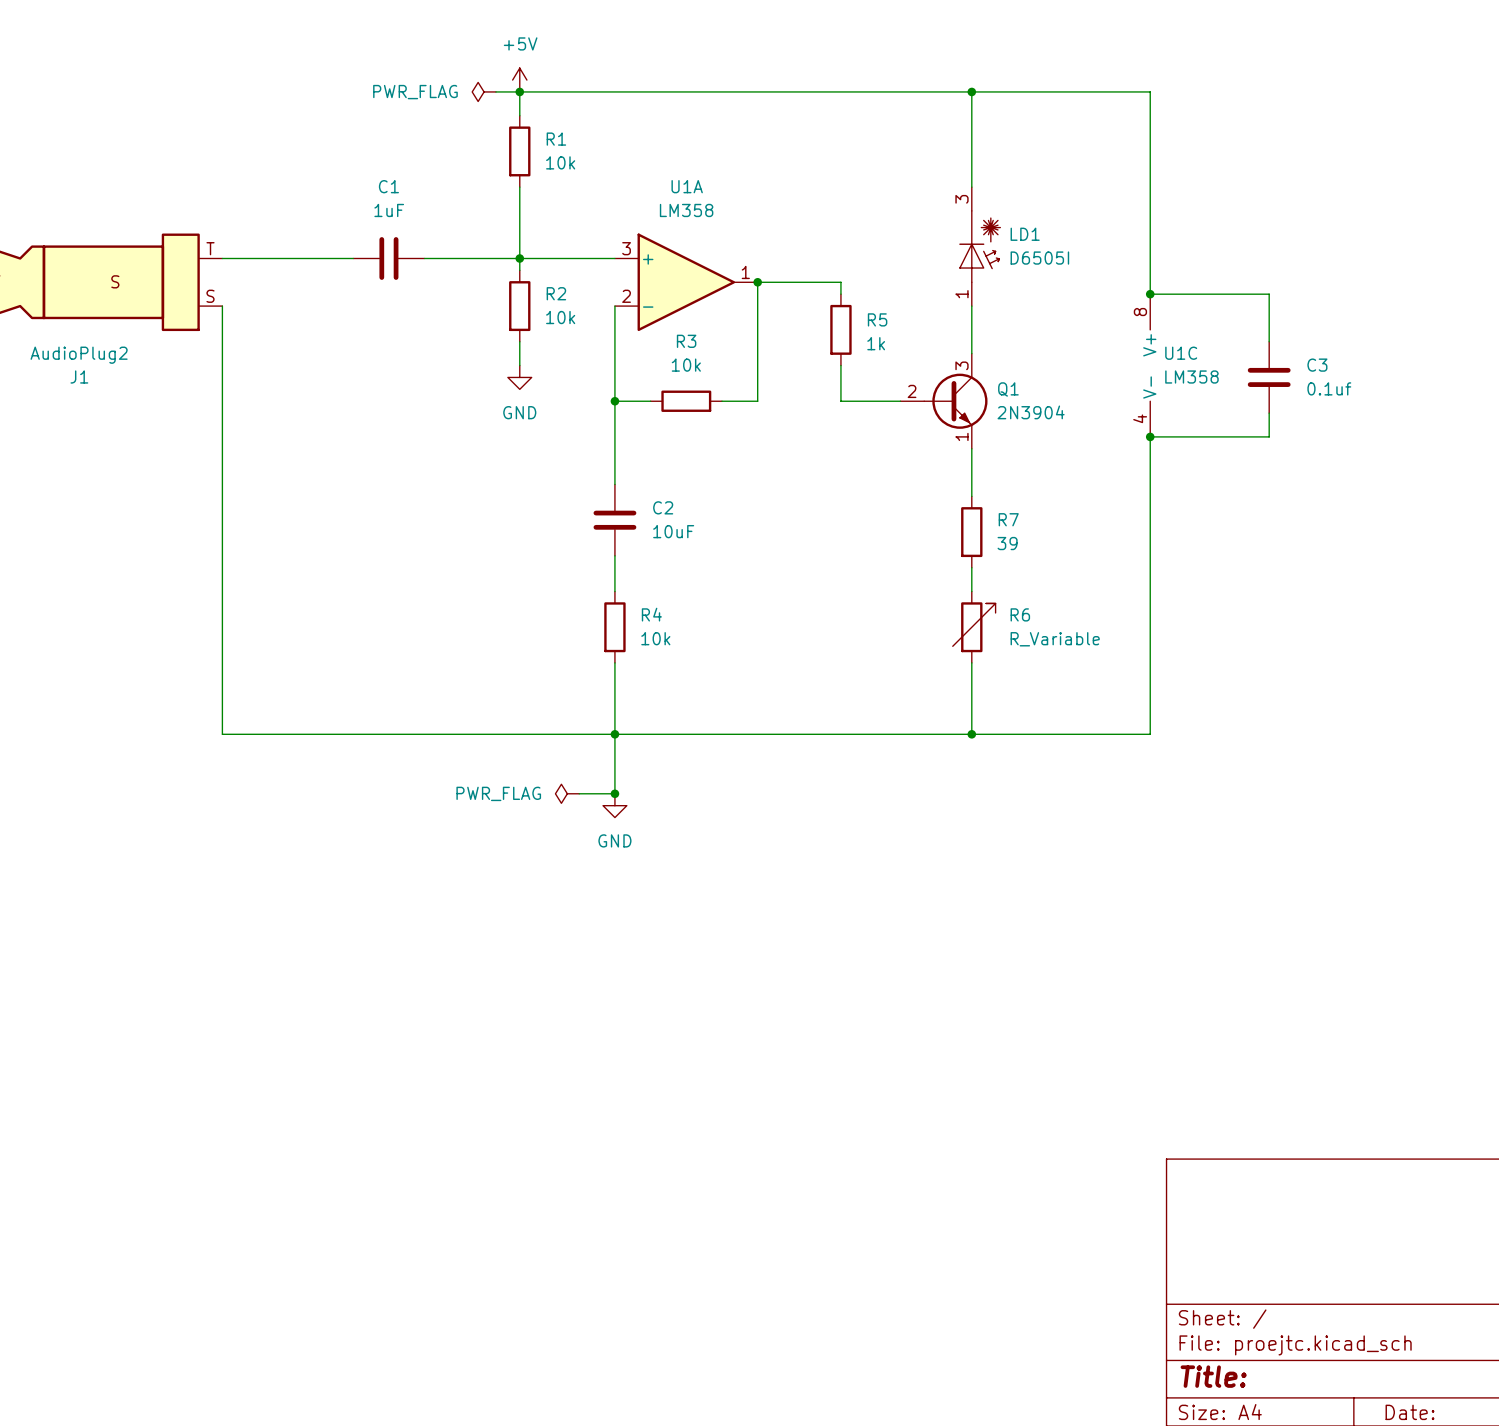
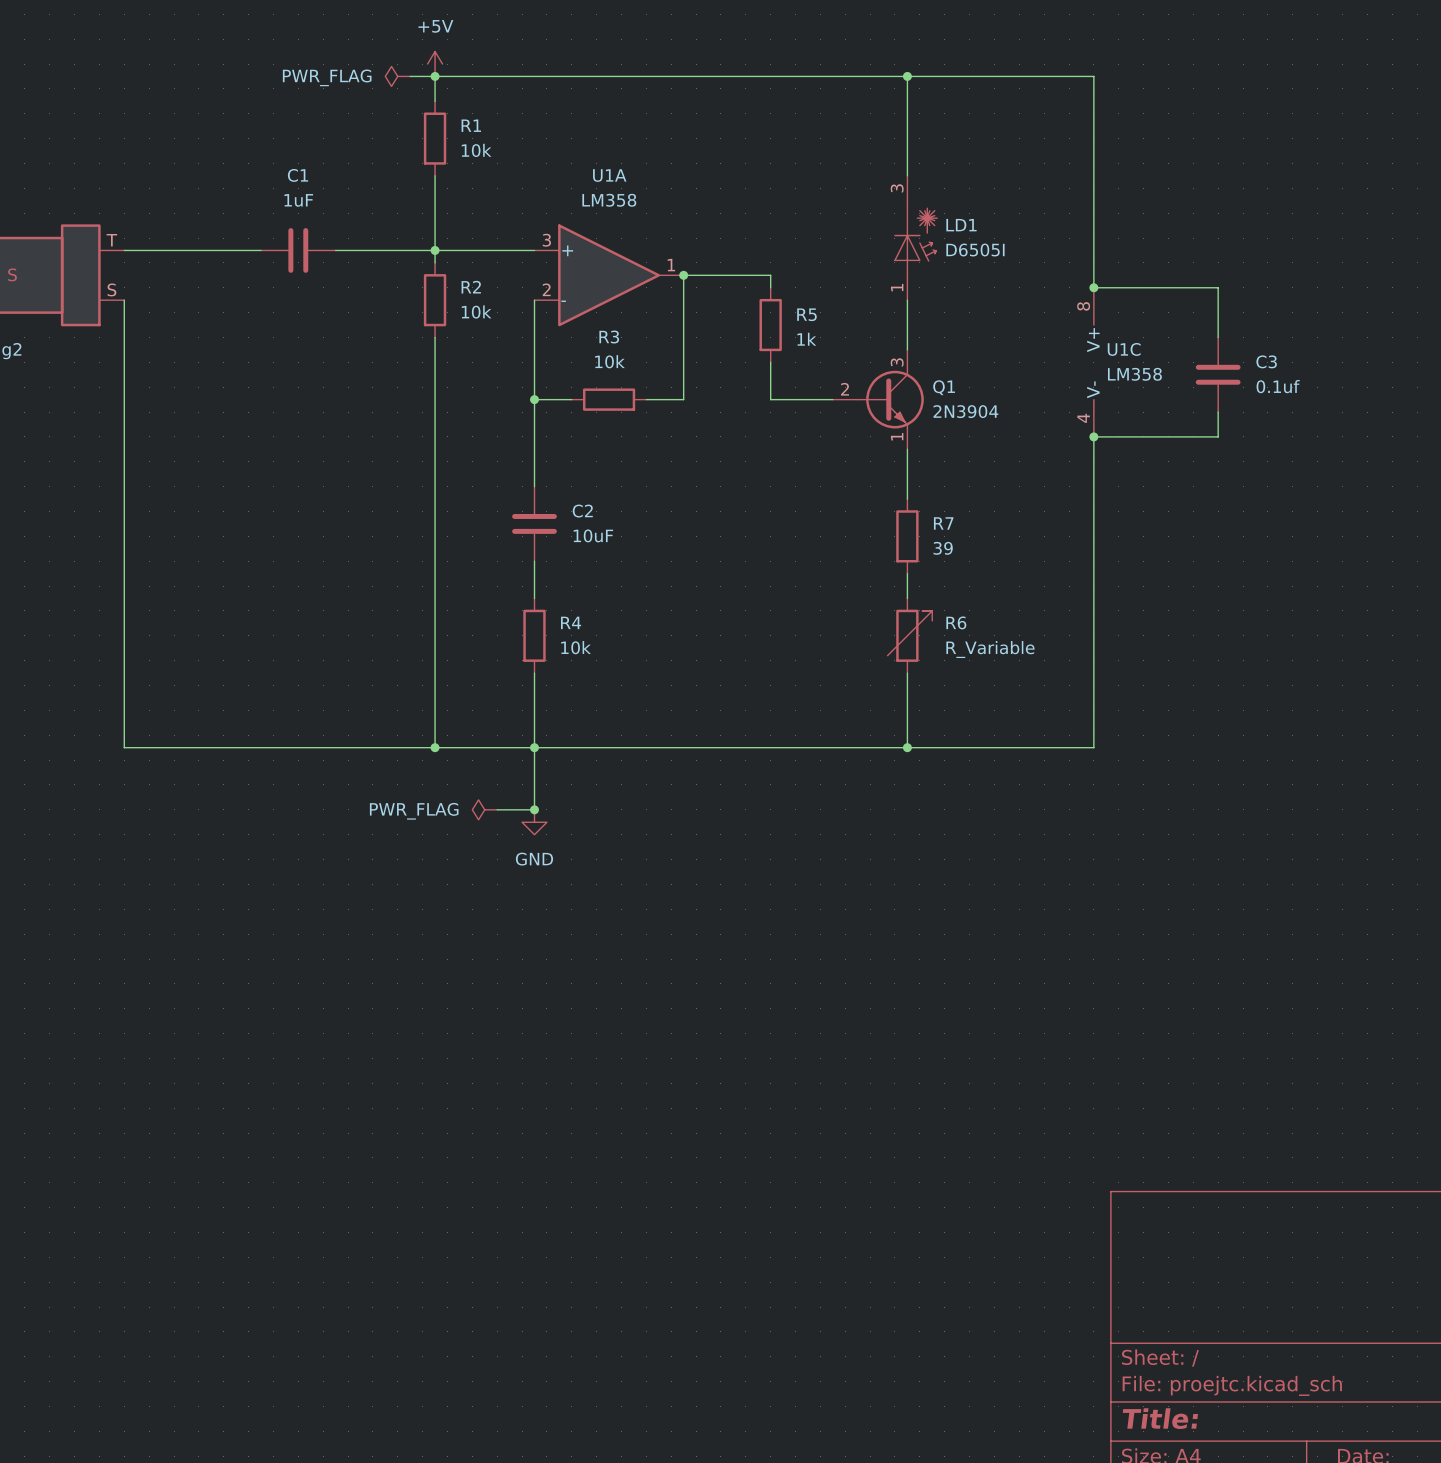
wire: none -> (435, 362) (435, 747)
power symbol: GND (519, 377) -> none
junction: none -> (435, 747)

